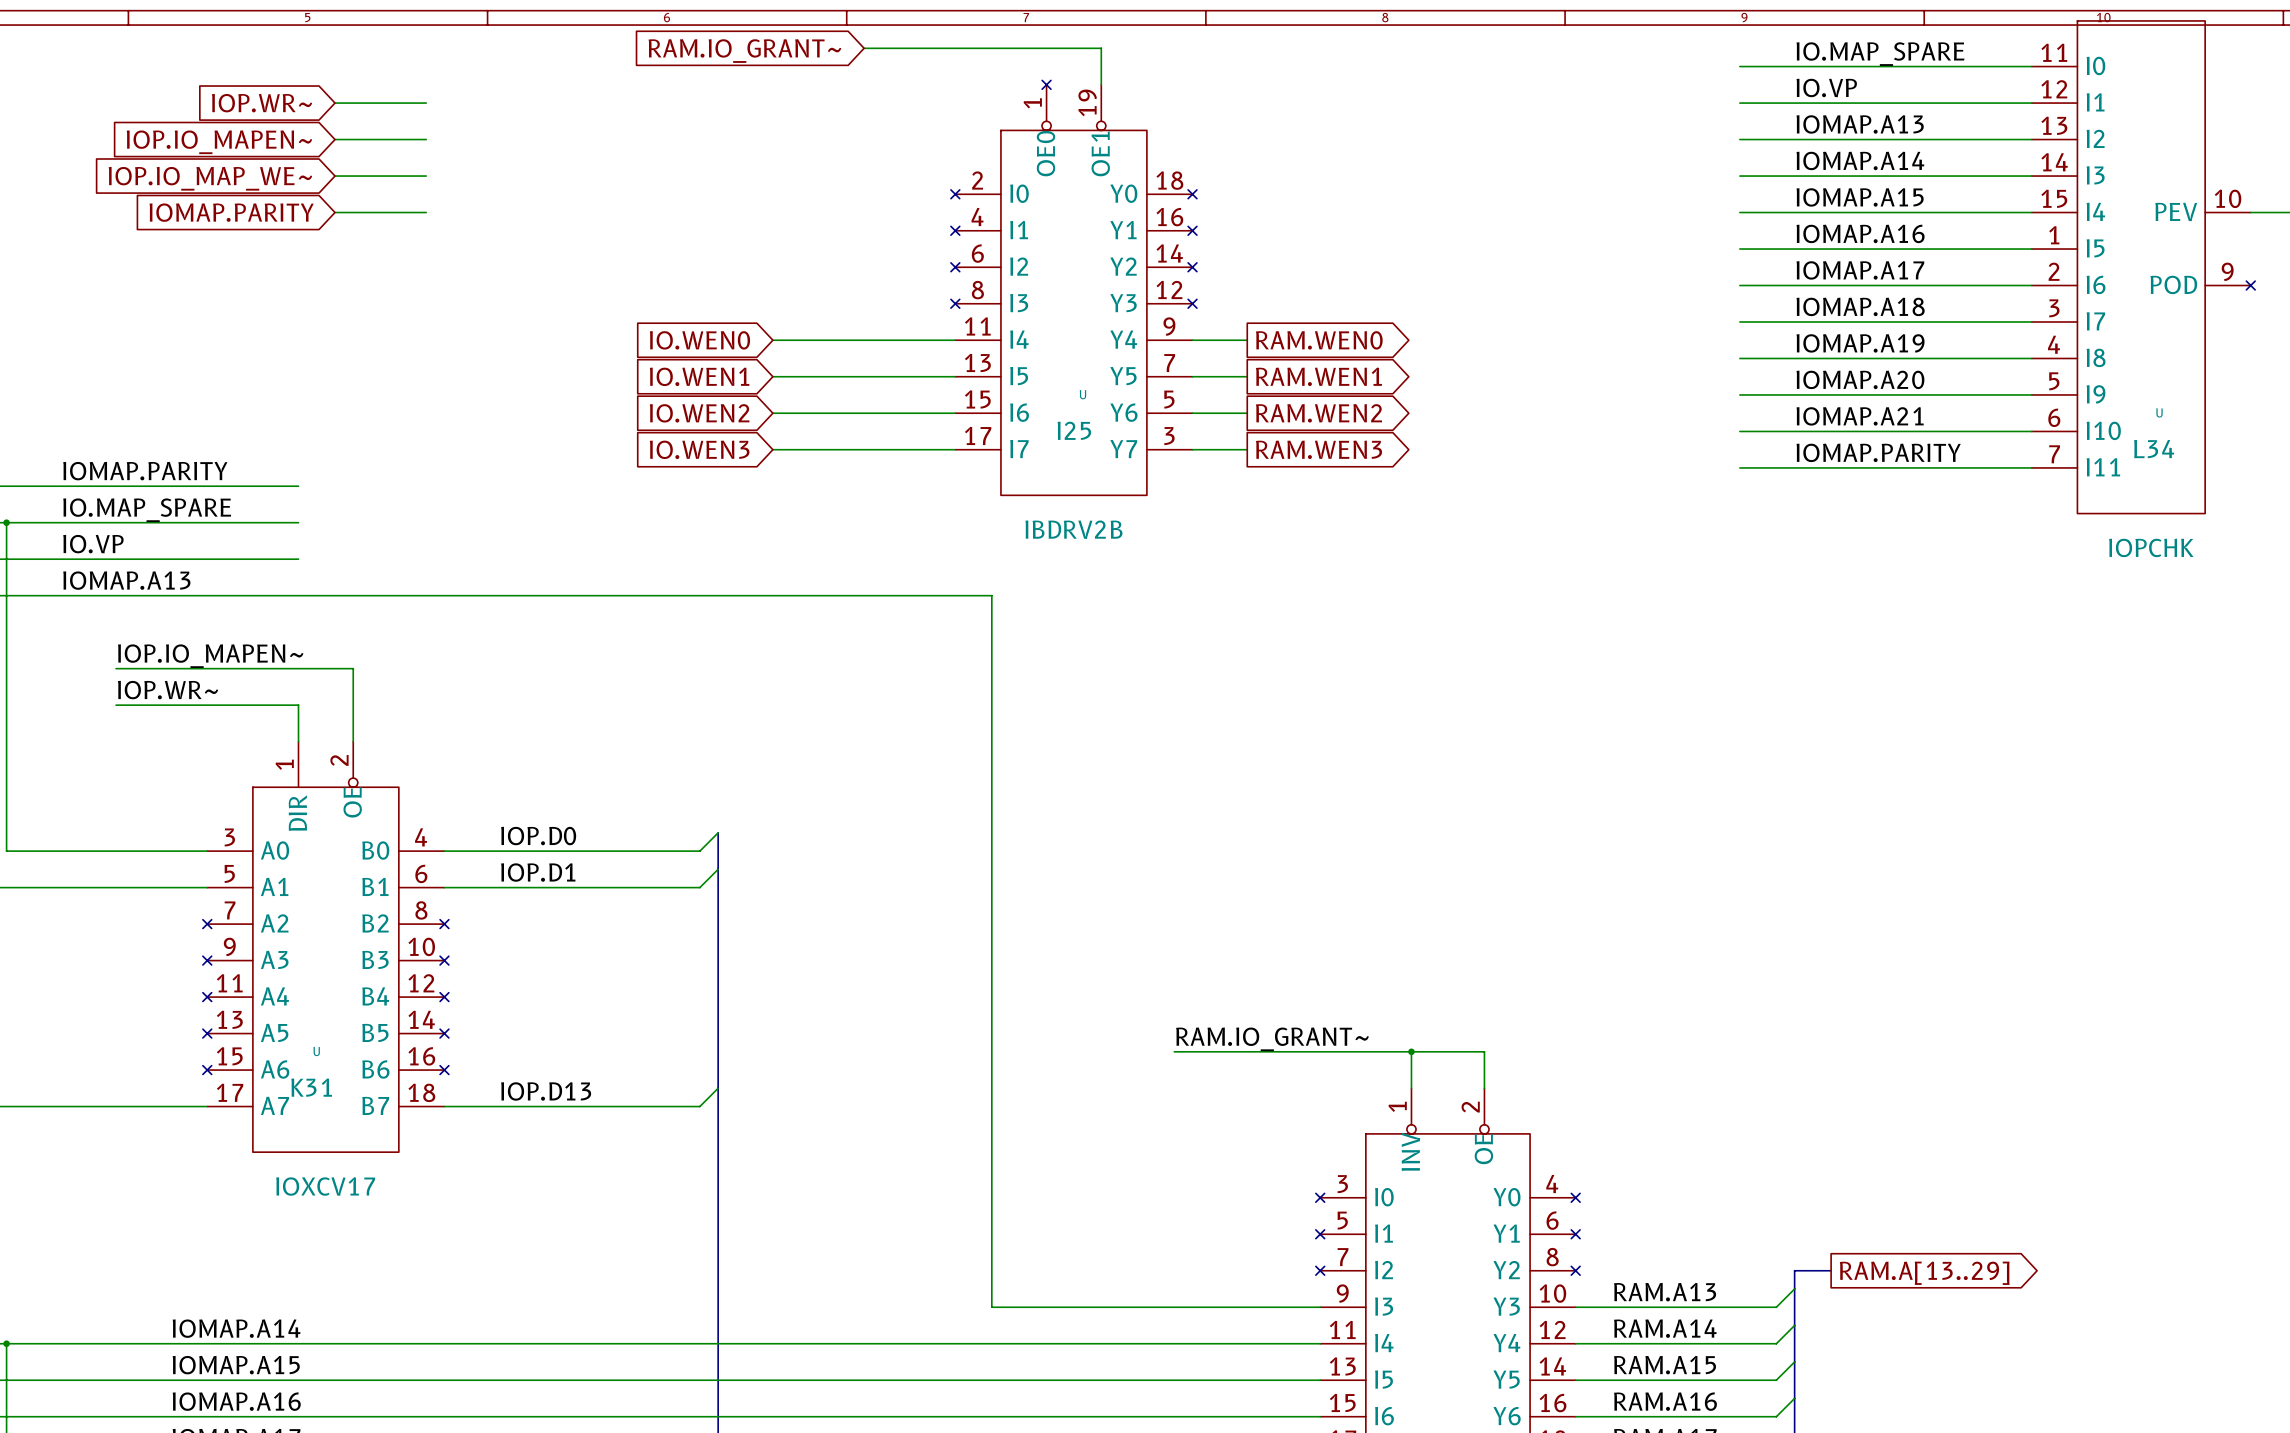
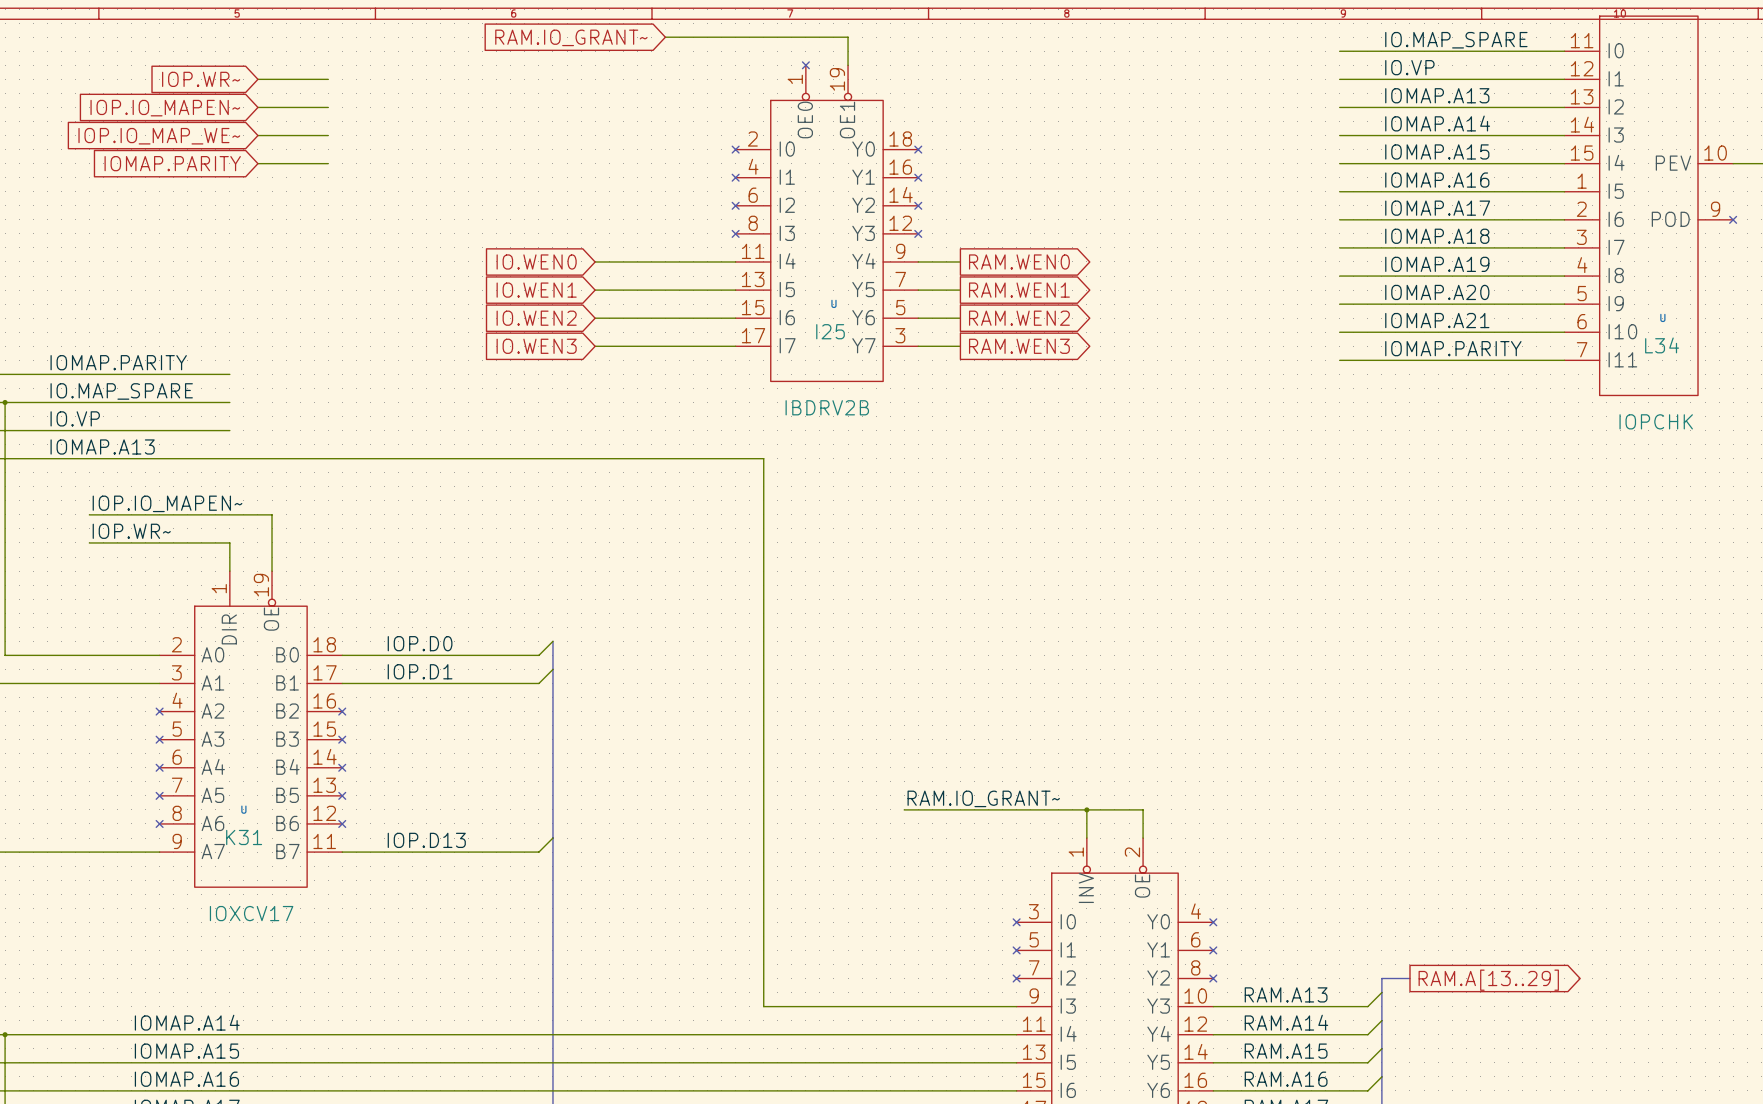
U symbol: [207, 741, 445, 1153] -> [159, 571, 343, 888]

